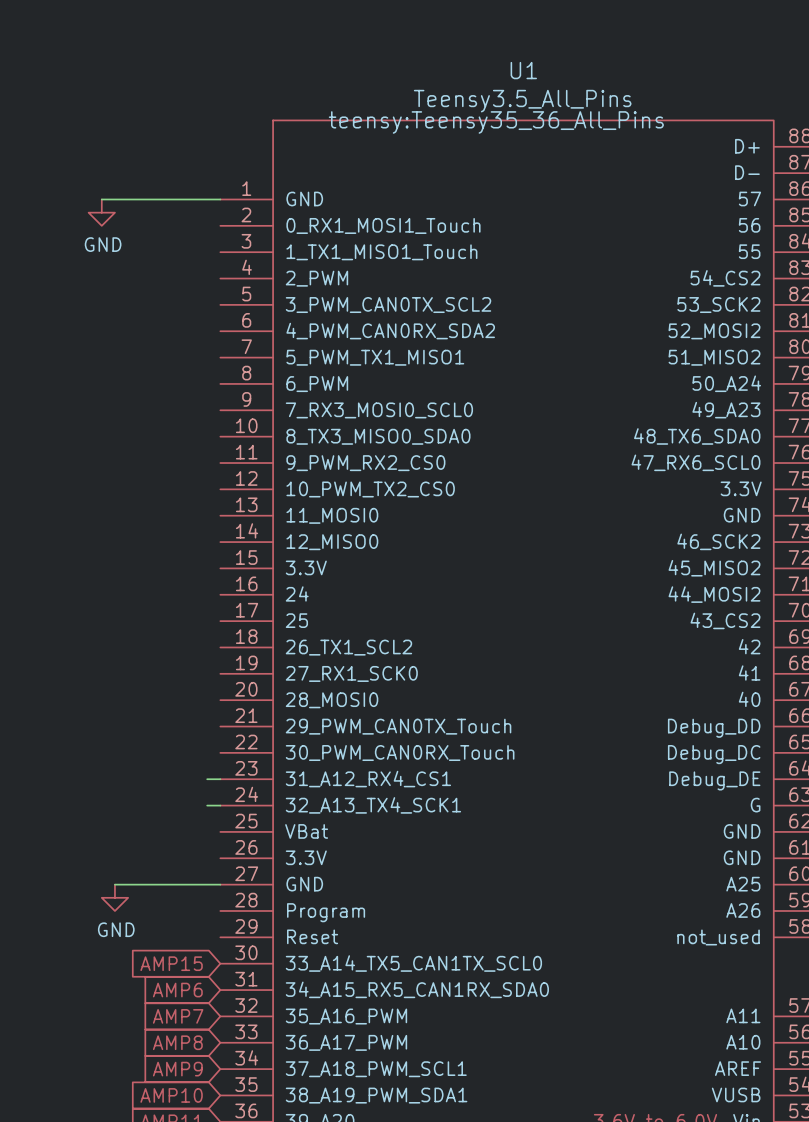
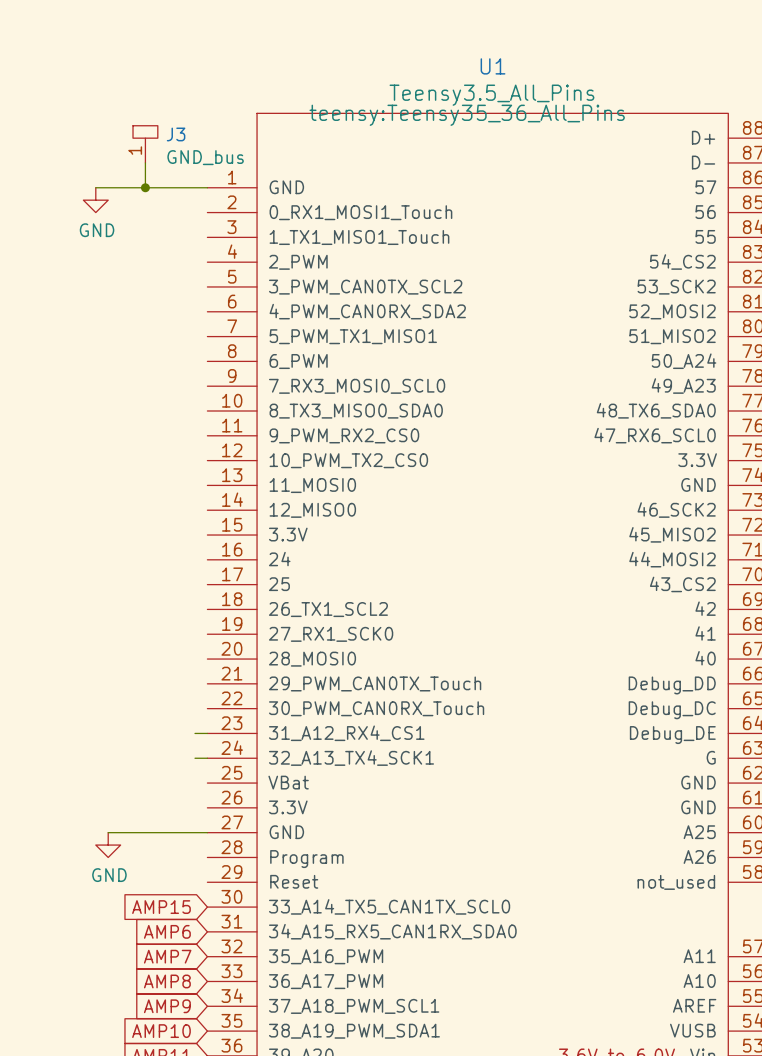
J3: none -> GND_bus (145, 144)
wire: none -> (145, 162) (145, 187)
junction: none -> (145, 187)

